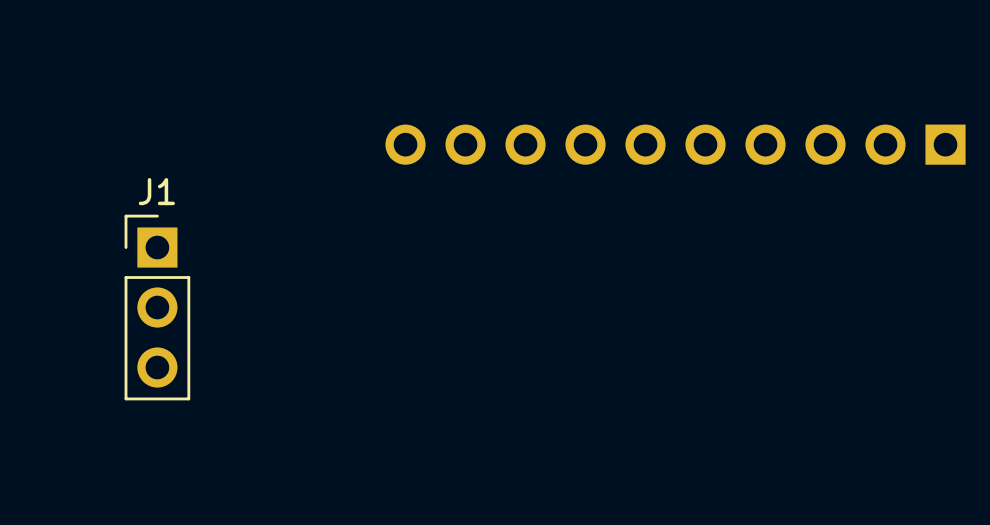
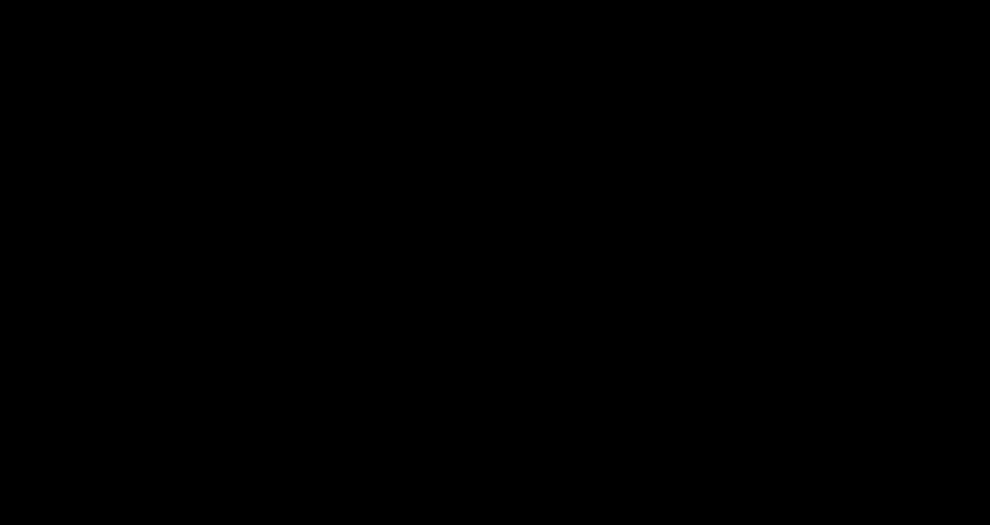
part: (675, 144) -> none
J1: (157, 307) -> none

